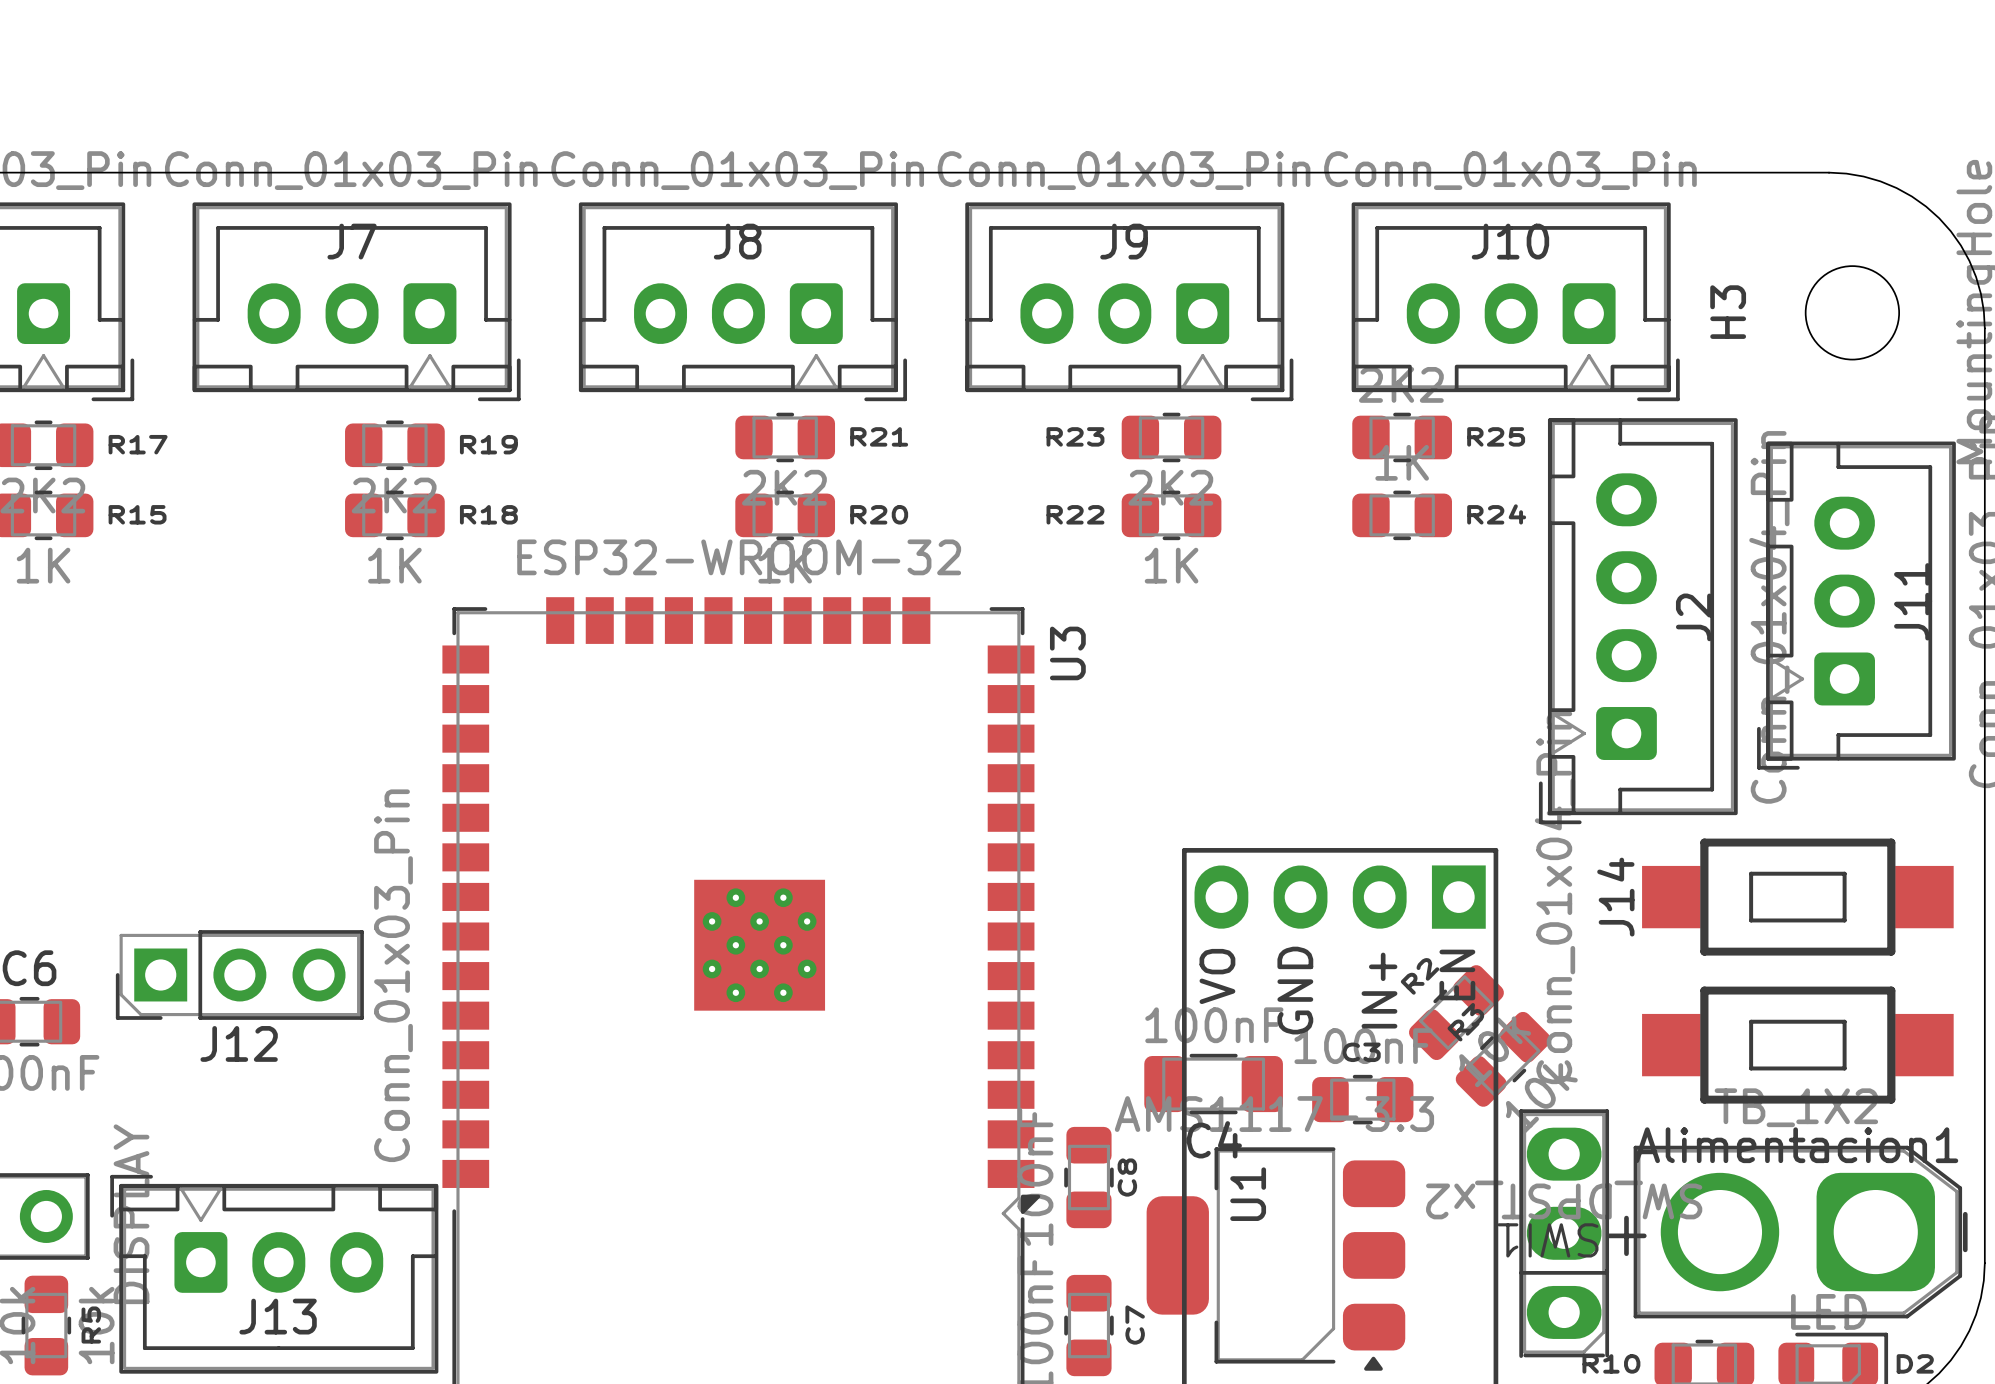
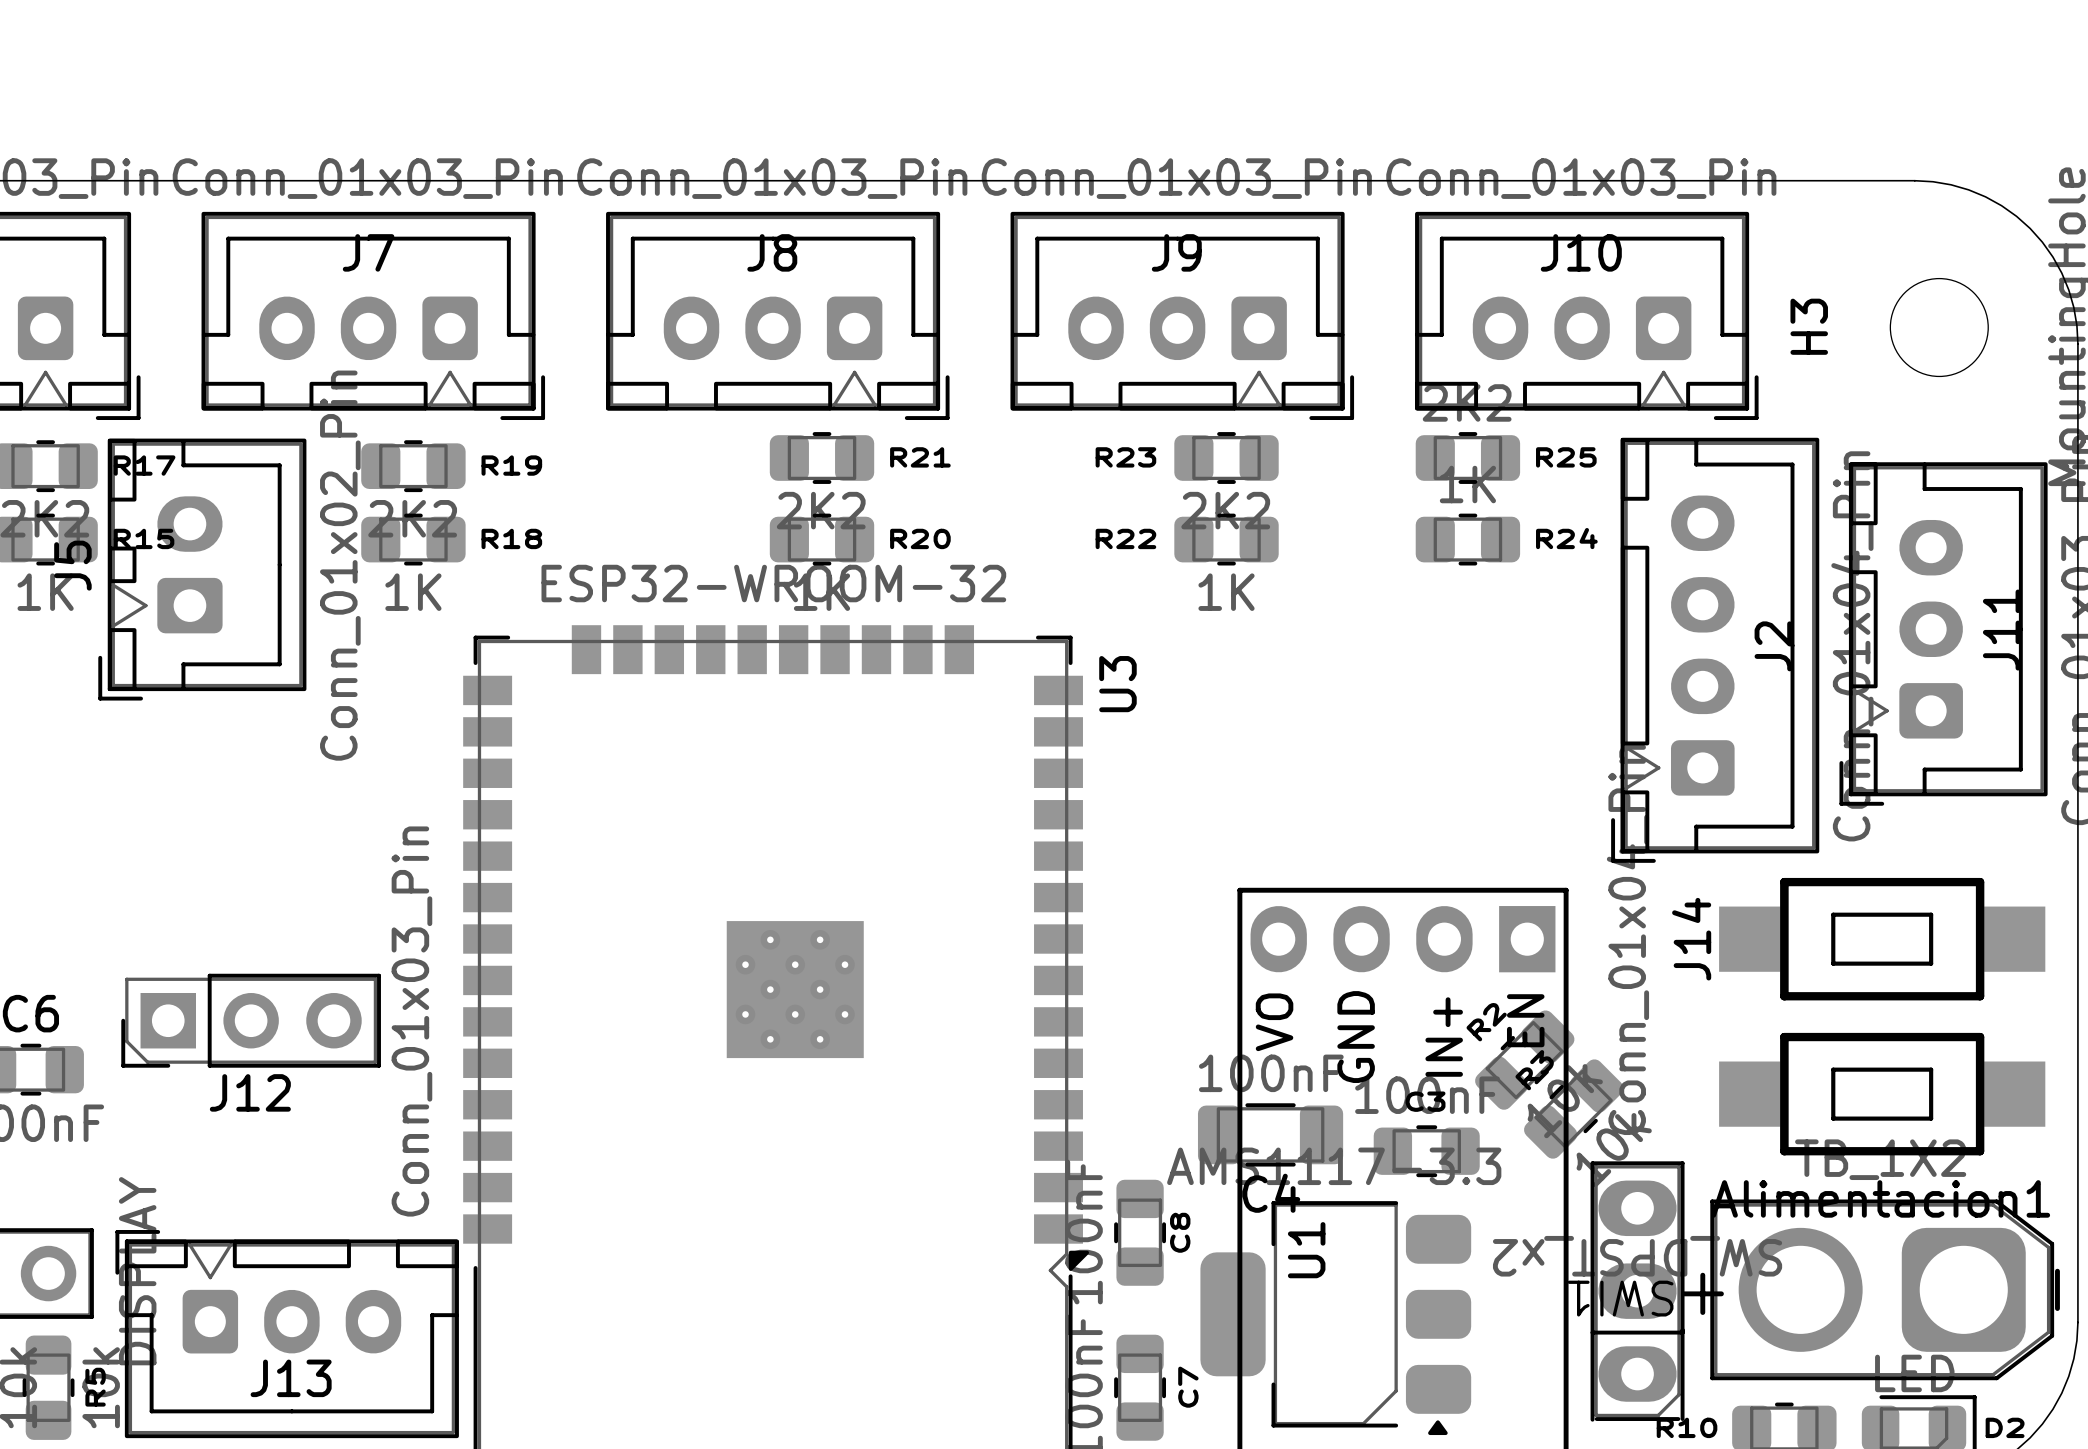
J5: none -> Conn_01x02_Pin (202, 569)

